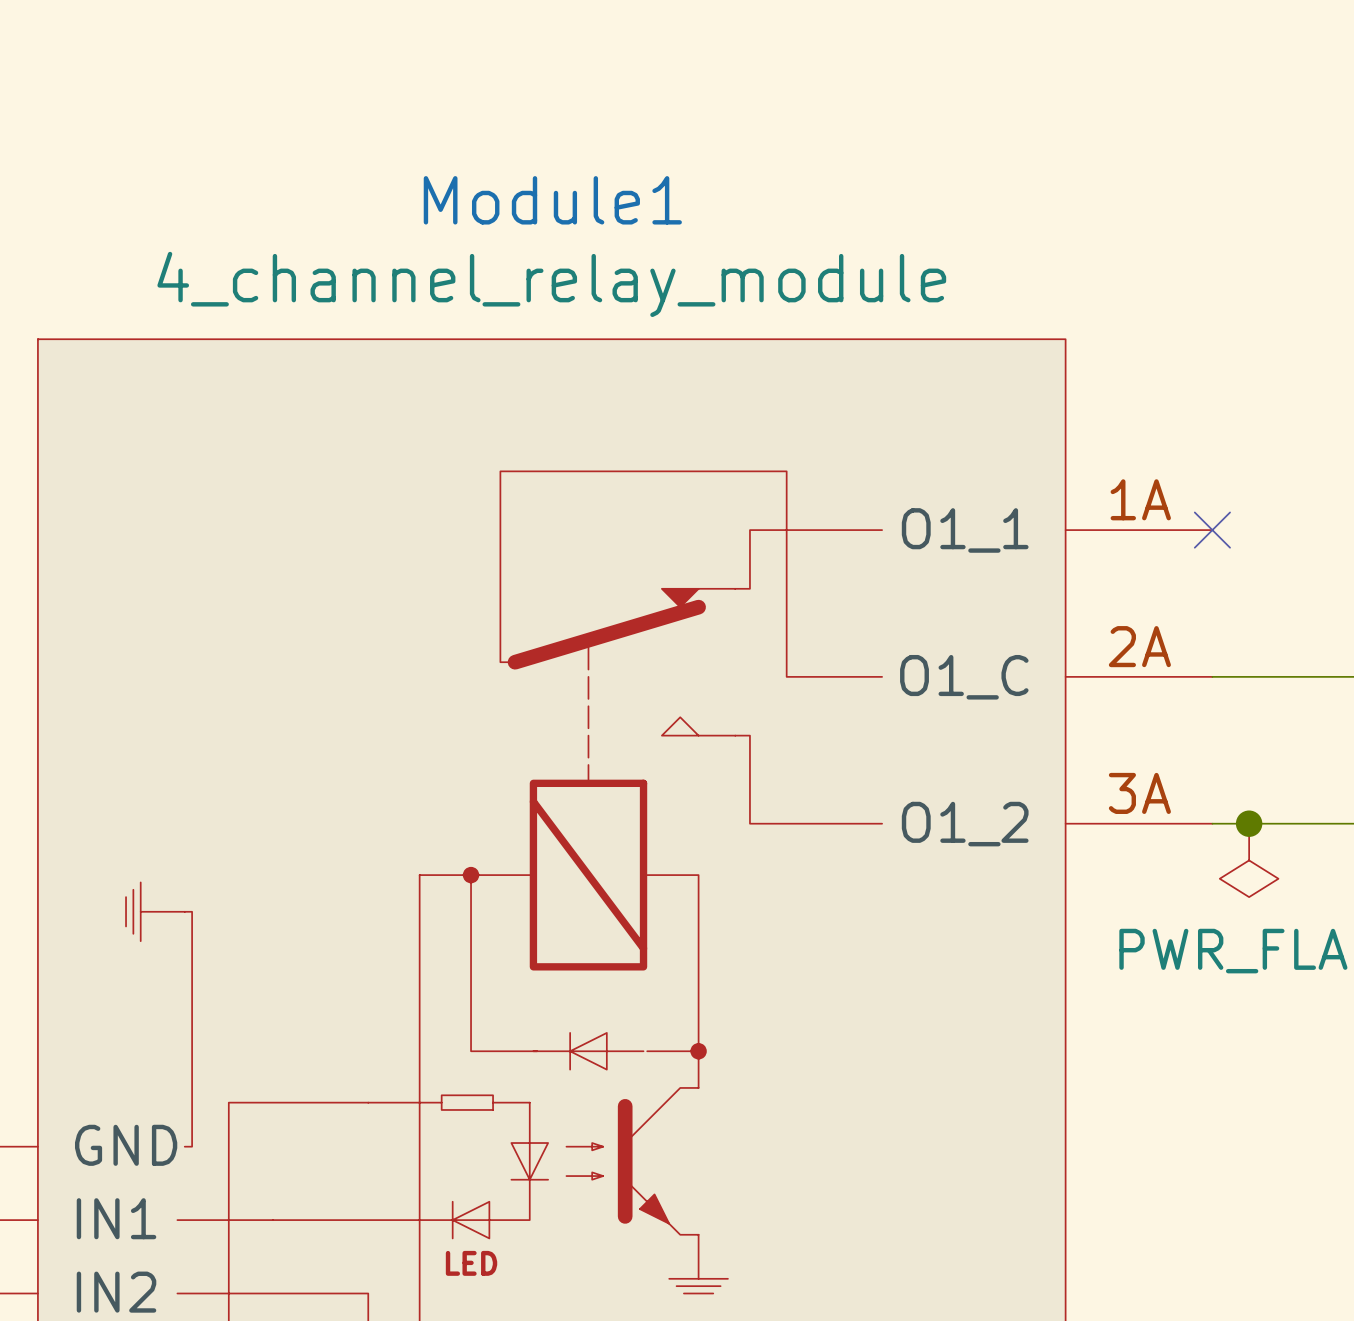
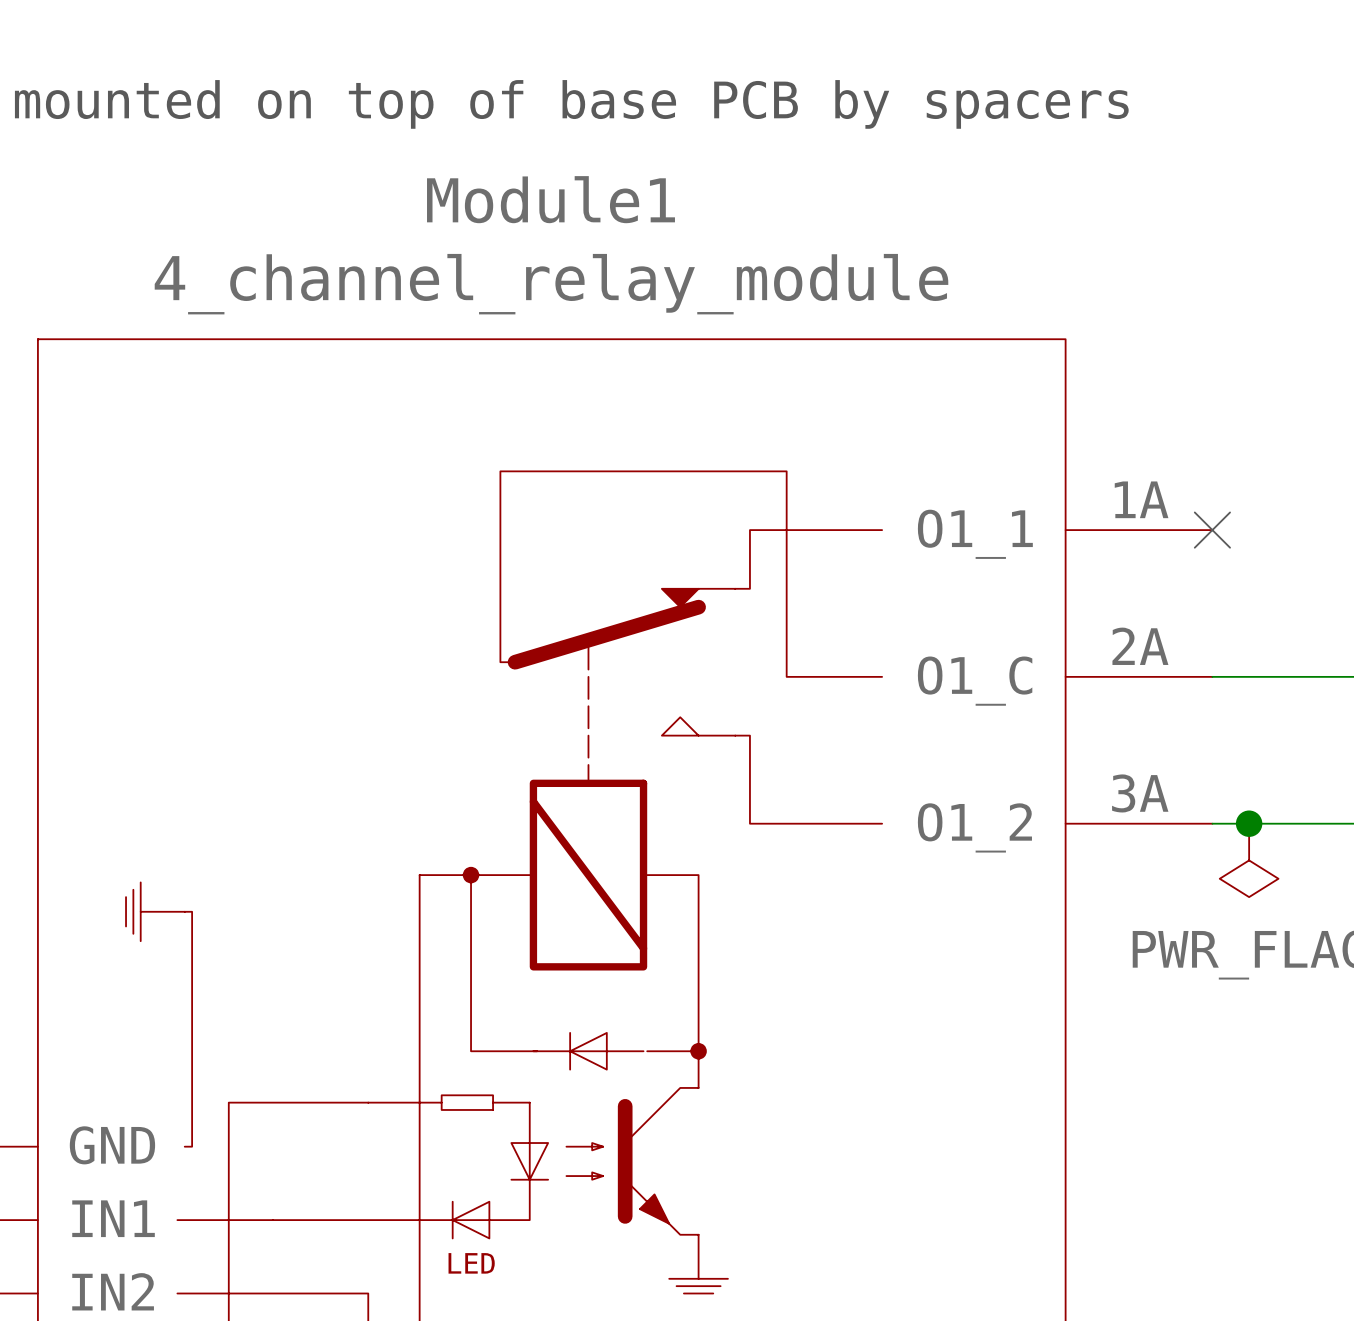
text: none -> mounted on top of base PCB by spacers (571, 104)

